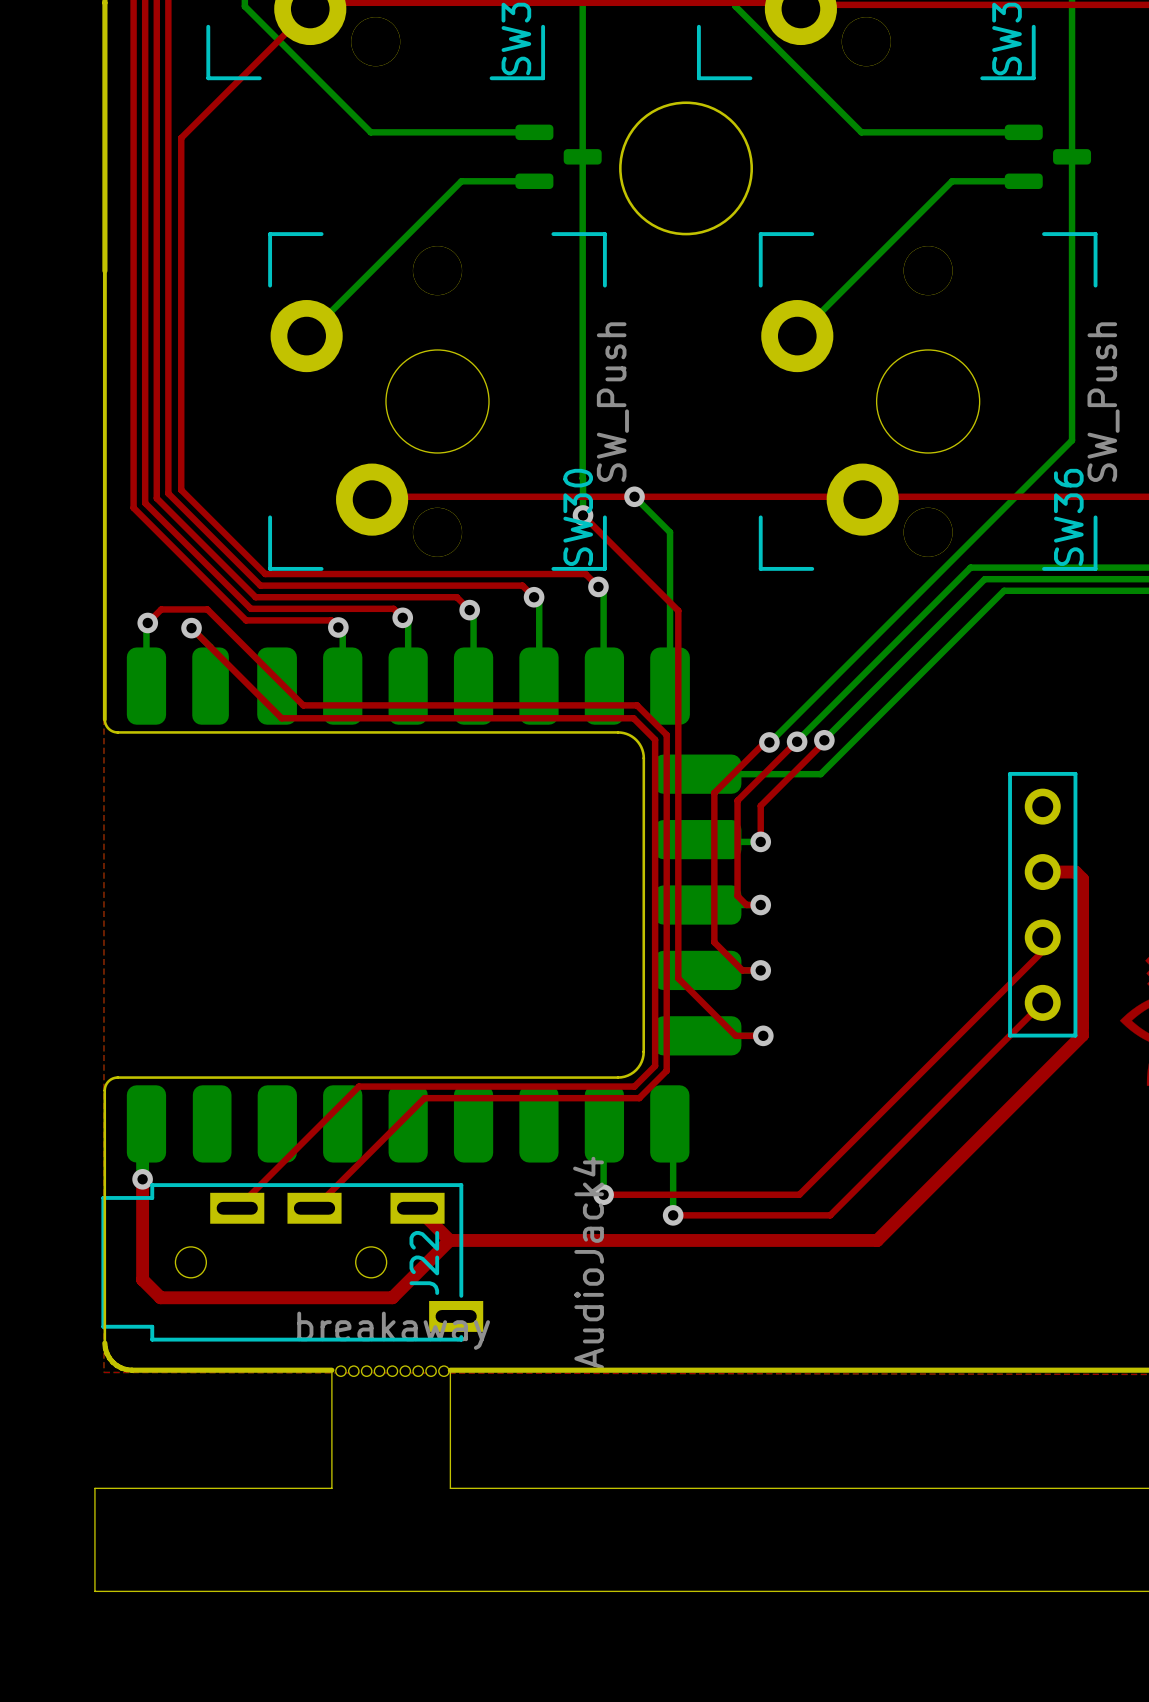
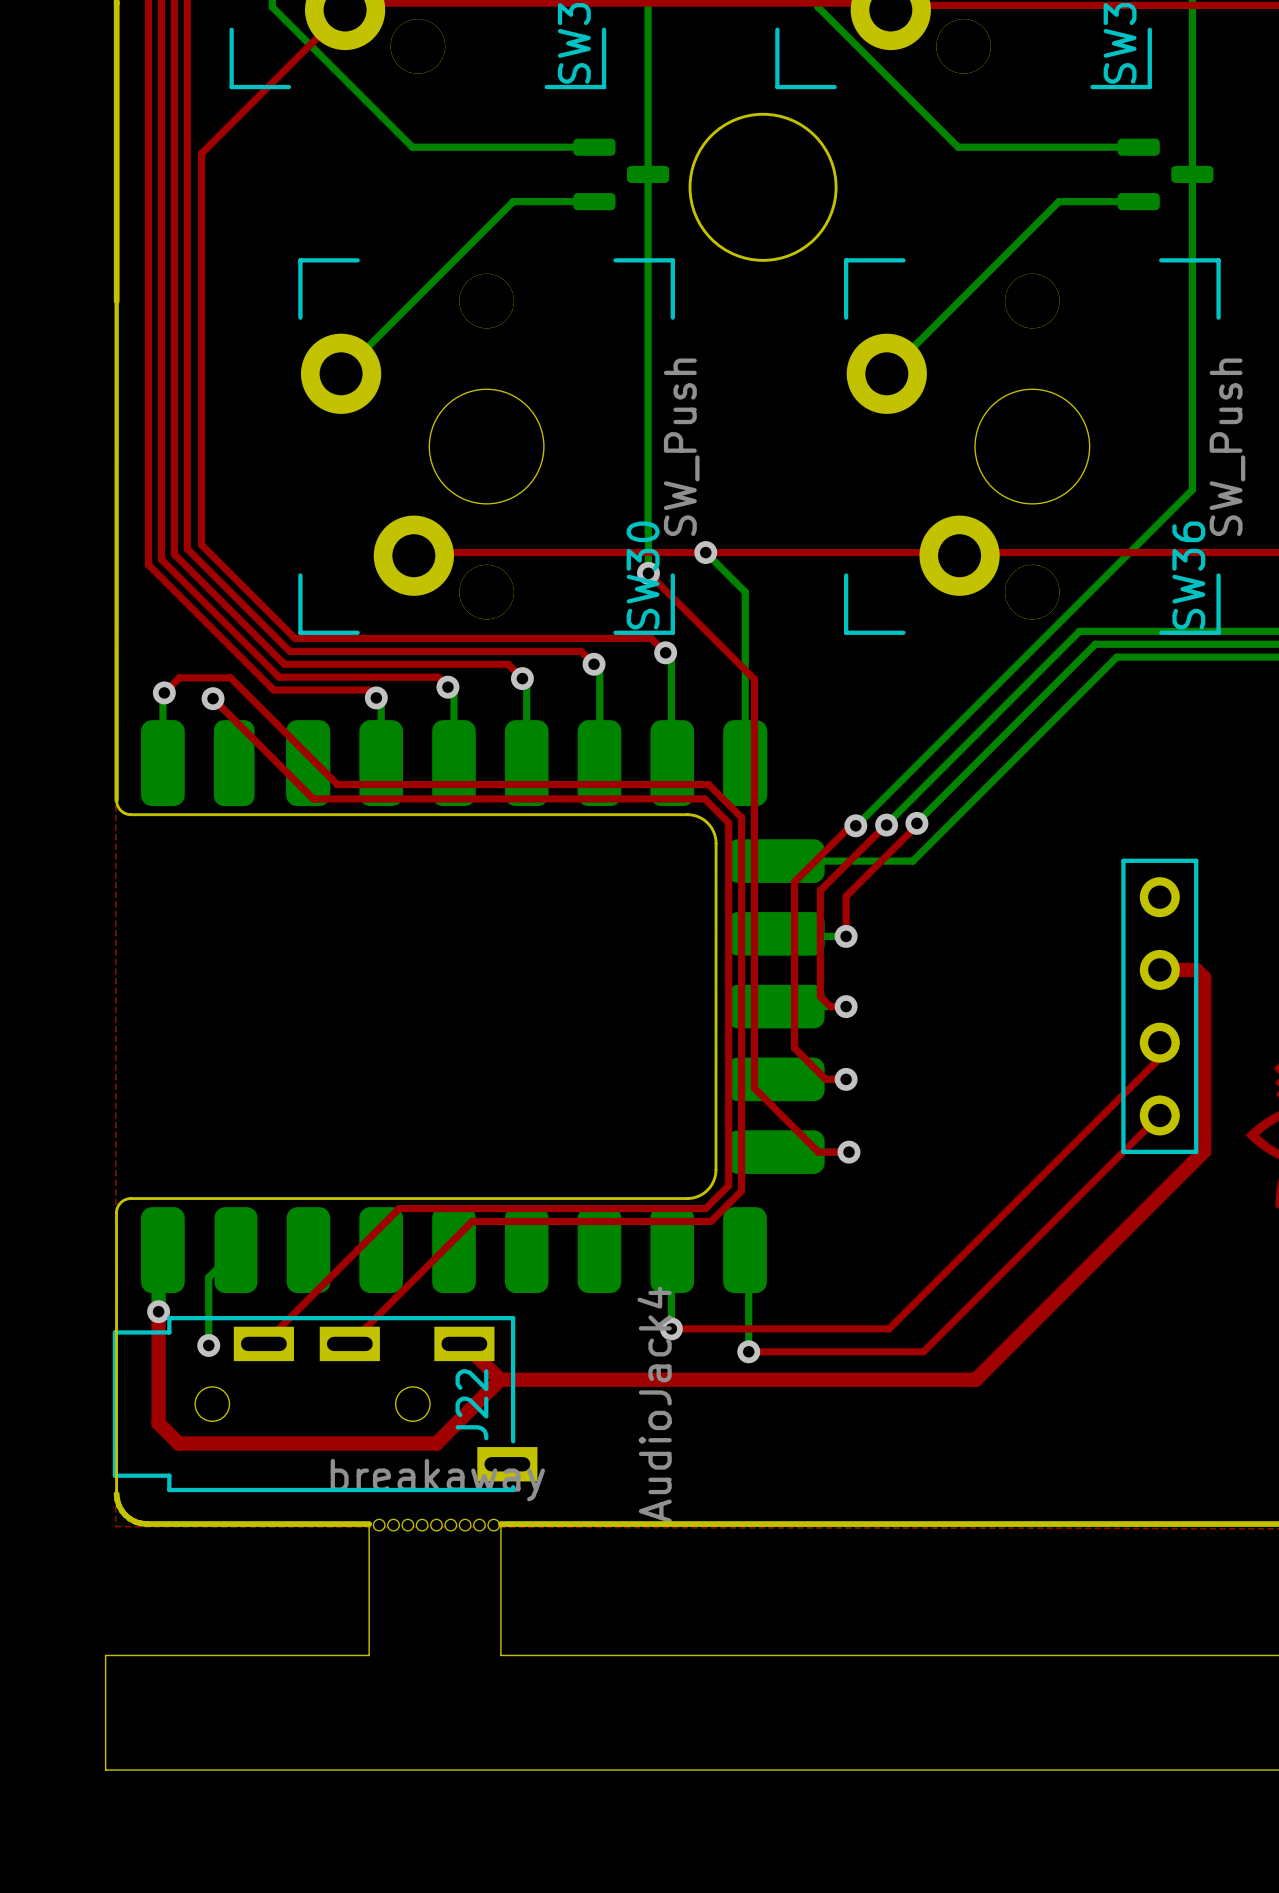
bottom track: none -> (235, 1250) (208, 1277) (208, 1345)
via: none -> (208, 1345)

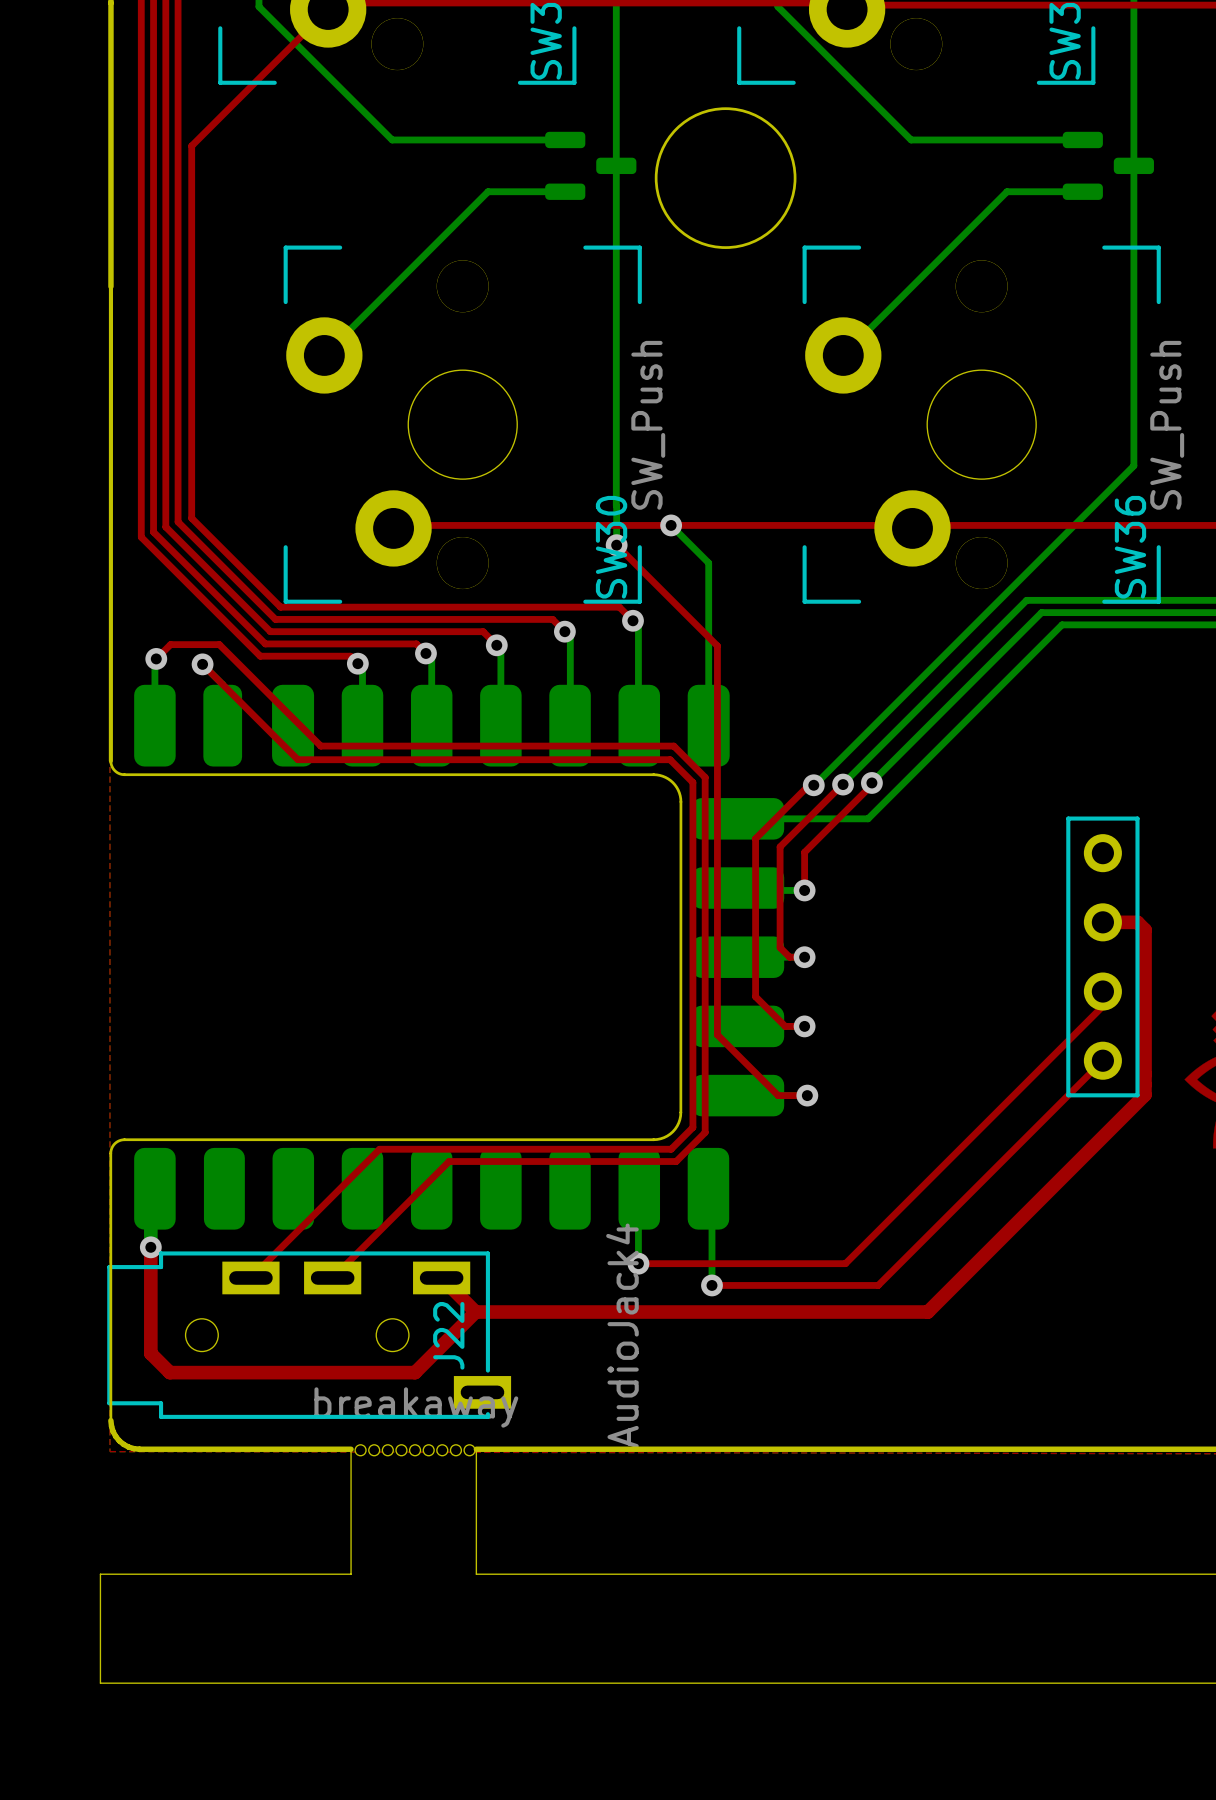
bottom track: (235, 1250) (208, 1277) (208, 1345) -> none
via: (208, 1345) -> none

